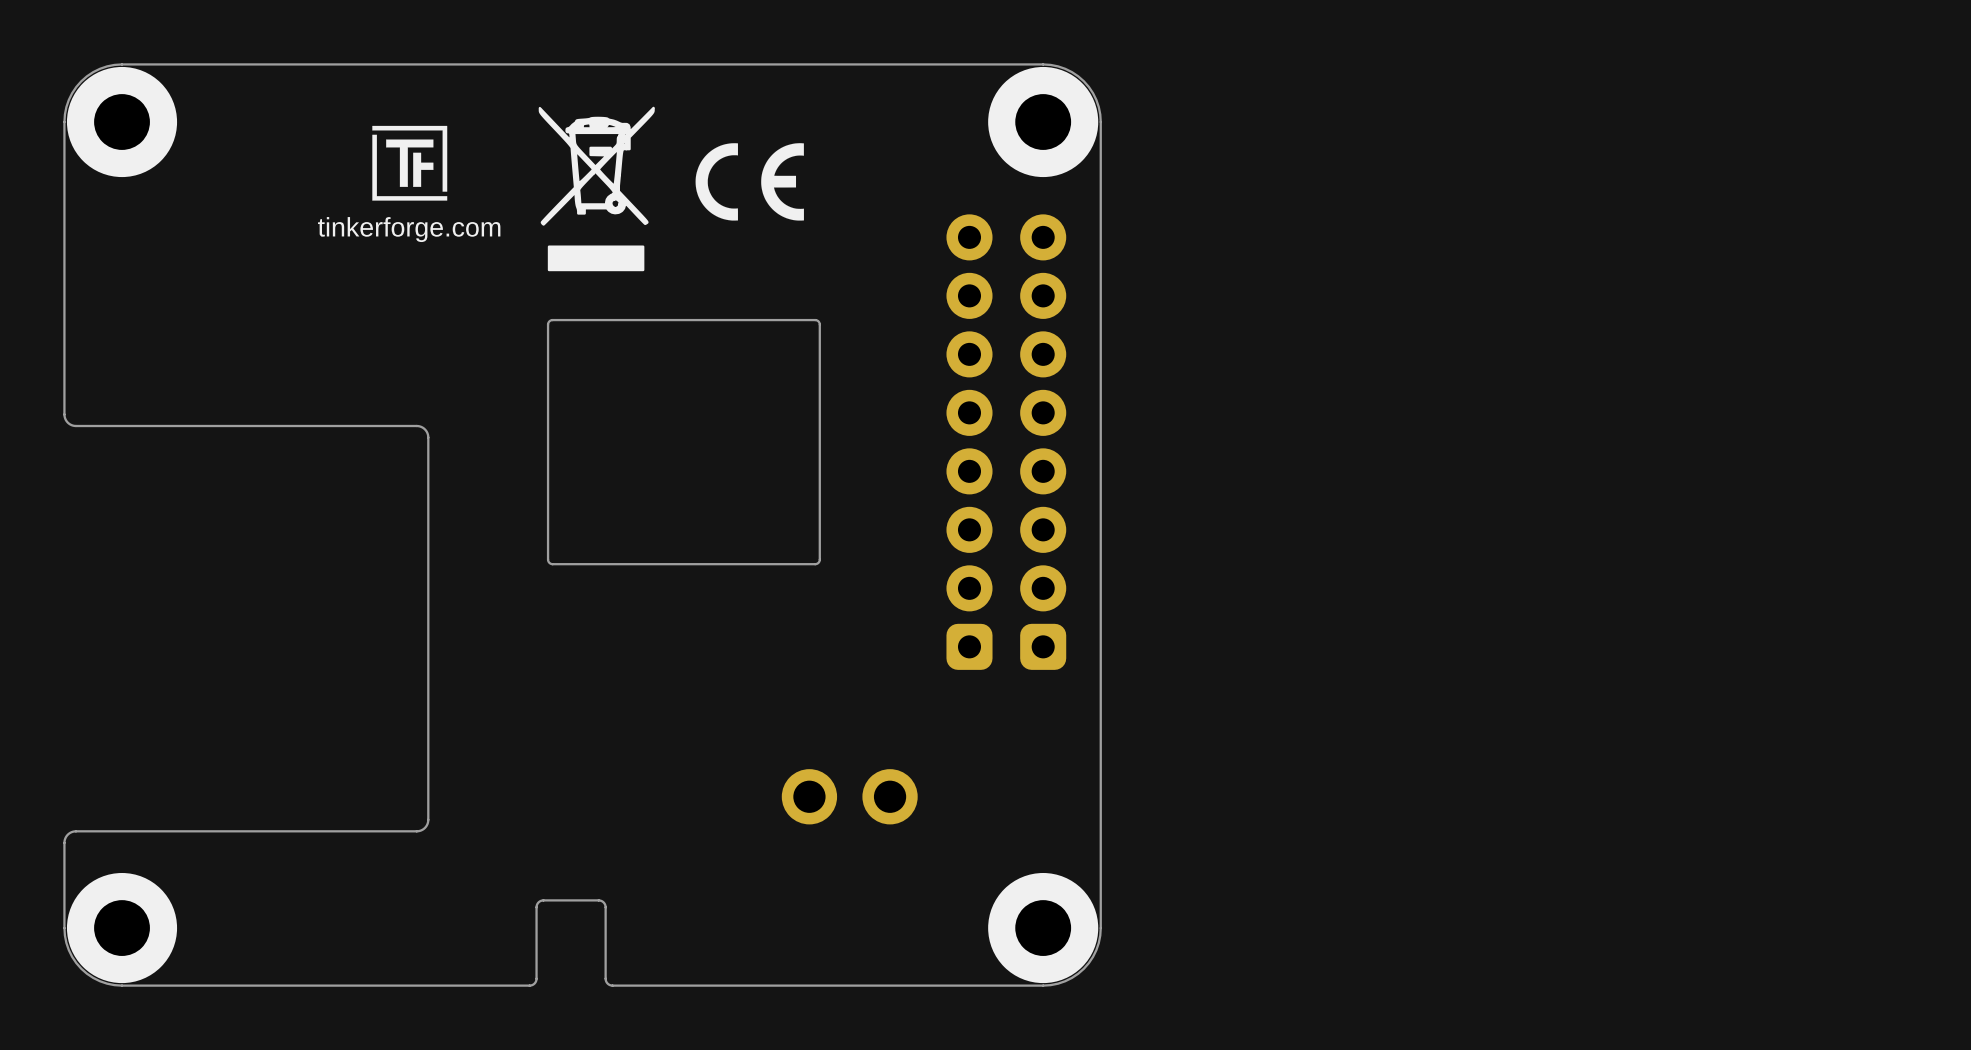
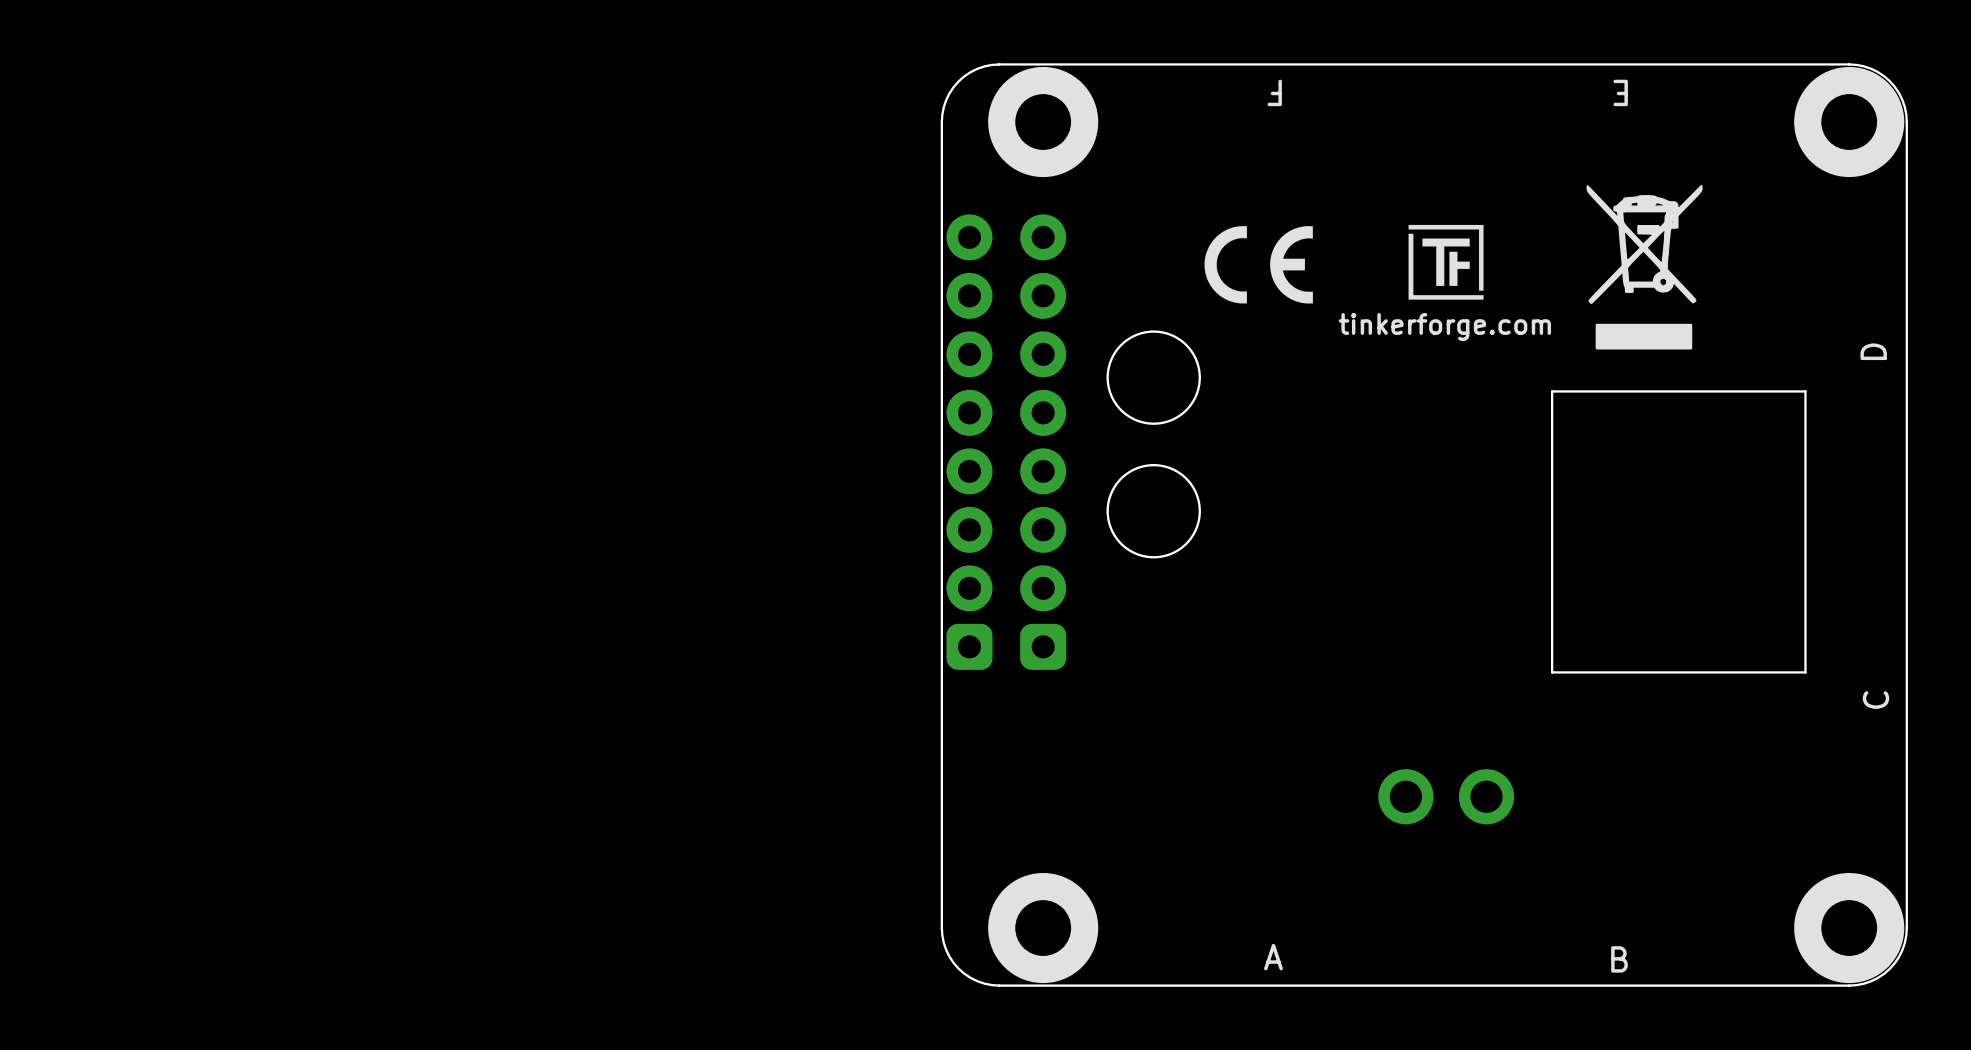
board edge: (999, 64) (122, 64) (99, 68) (81, 81) (68, 99) (64, 122) (64, 414) (68, 423) (75, 426) (416, 426) (424, 429) (428, 437) (428, 819) (426, 825) (422, 829) (416, 831) (71, 832) (66, 835) (64, 842) (64, 935) (72, 956) (81, 968) (99, 981) (122, 985) (530, 985) (536, 979) (537, 903) (543, 900) (598, 900) (602, 901) (605, 906) (605, 979) (610, 985) (999, 985) -> (999, 64) (977, 68) (958, 81) (946, 99) (941, 122) (942, 935) (949, 956) (964, 973) (984, 983) (999, 985)
board edge: (1043, 64) (1065, 68) (1083, 81) (1096, 99) (1100, 122) (1100, 935) (1093, 956) (1083, 968) (1065, 981) (1043, 985) -> (1043, 64) (1856, 64) (1878, 72) (1894, 86) (1904, 107) (1906, 122) (1906, 928) (1902, 950) (1889, 968) (1871, 981) (1849, 985) (1043, 985)
text: none -> F (1274, 92)
text: none -> E (1620, 92)
drawing: [538, 106, 655, 272] -> none
part: (122, 122) -> none
part: none -> (1849, 122)
drawing: [372, 125, 448, 201] -> none
drawing position: (749, 181) -> (1258, 264)
drawing: none -> [1586, 185, 1703, 350]
drawing: none -> [1408, 224, 1484, 300]
text: tinkerforge.com (409, 229) -> none
board edge: (815, 320) (549, 321) (549, 562) (818, 562) (819, 324) (815, 320) -> none
text: none -> tinkerforge.com (1444, 327)
round board edge: none -> [1106, 330, 1201, 425]
text: none -> D (1873, 351)
board edge: none -> (1805, 391) (1552, 391) (1552, 672) (1805, 672) (1805, 391)
round board edge: none -> [1106, 464, 1201, 559]
text: none -> C (1875, 700)
part: (849, 796) -> none
part: none -> (1446, 796)
part: (122, 928) -> none
part: none -> (1849, 928)
text: none -> A (1273, 957)
text: none -> B (1619, 959)

